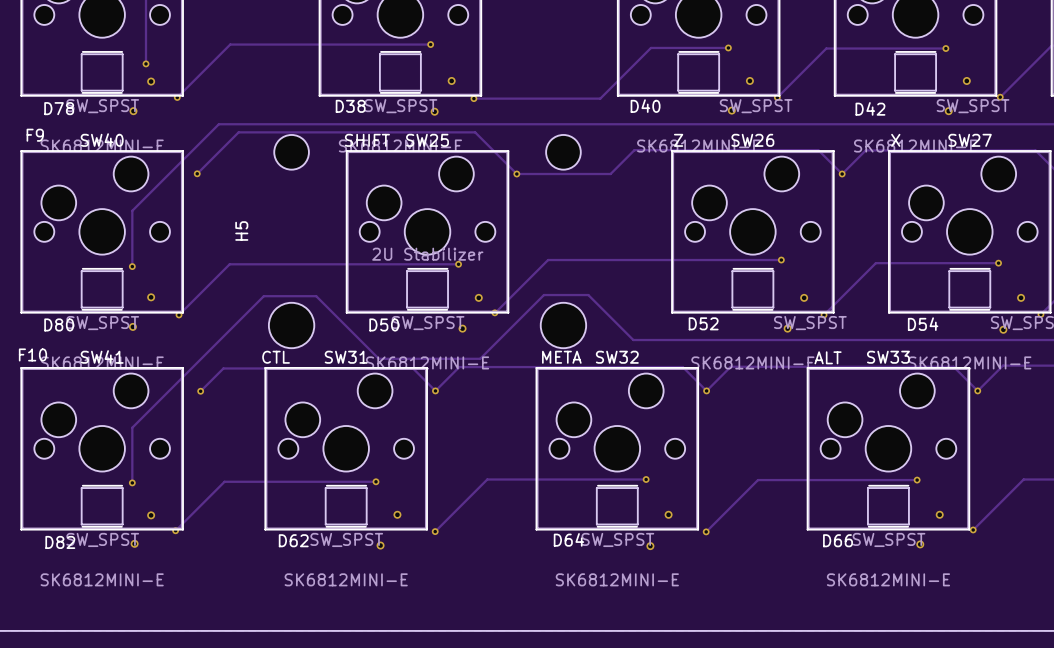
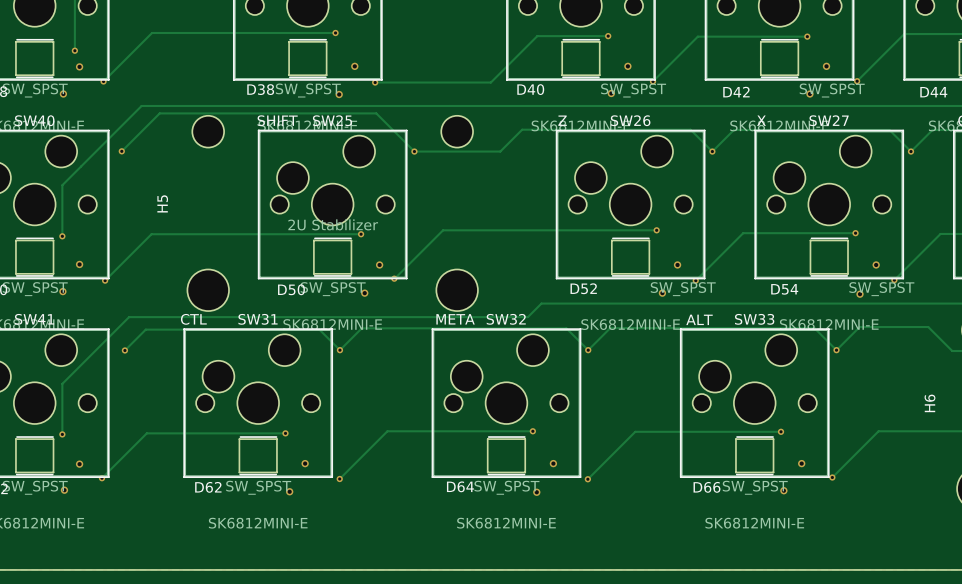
track: (655, 340) (633, 340) (588, 295) (543, 295) (480, 358) (378, 358) (316, 296) (263, 296) (205, 354) -> (541, 303) (527, 317) (129, 317)

